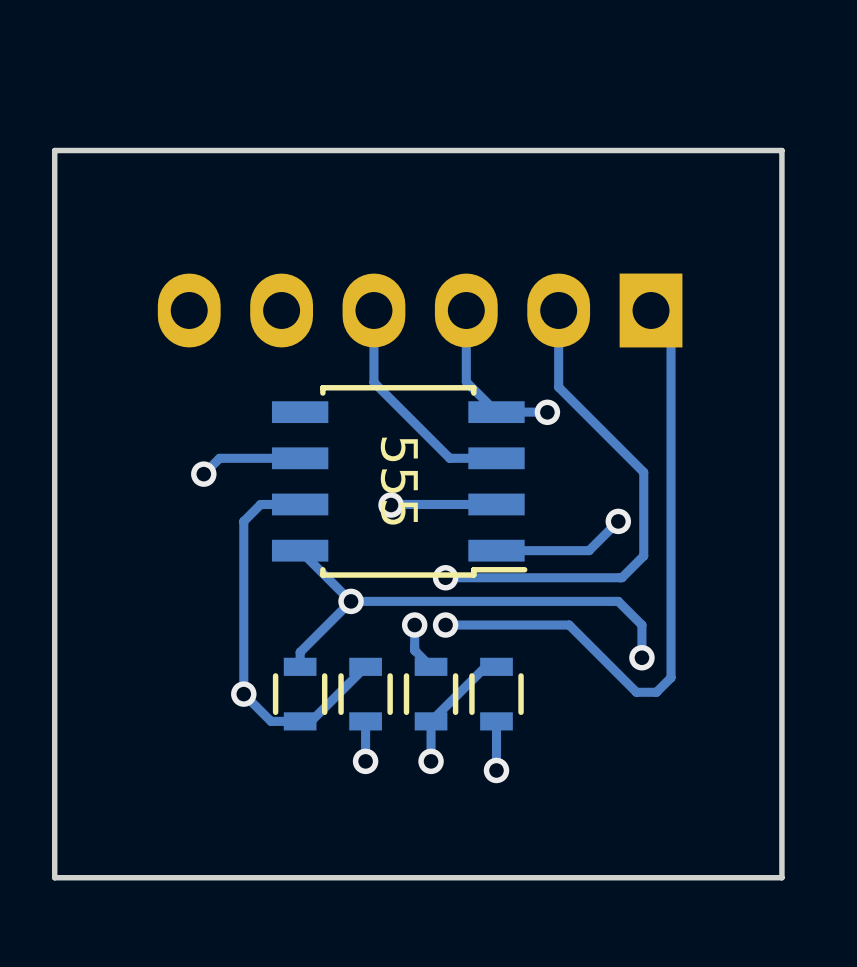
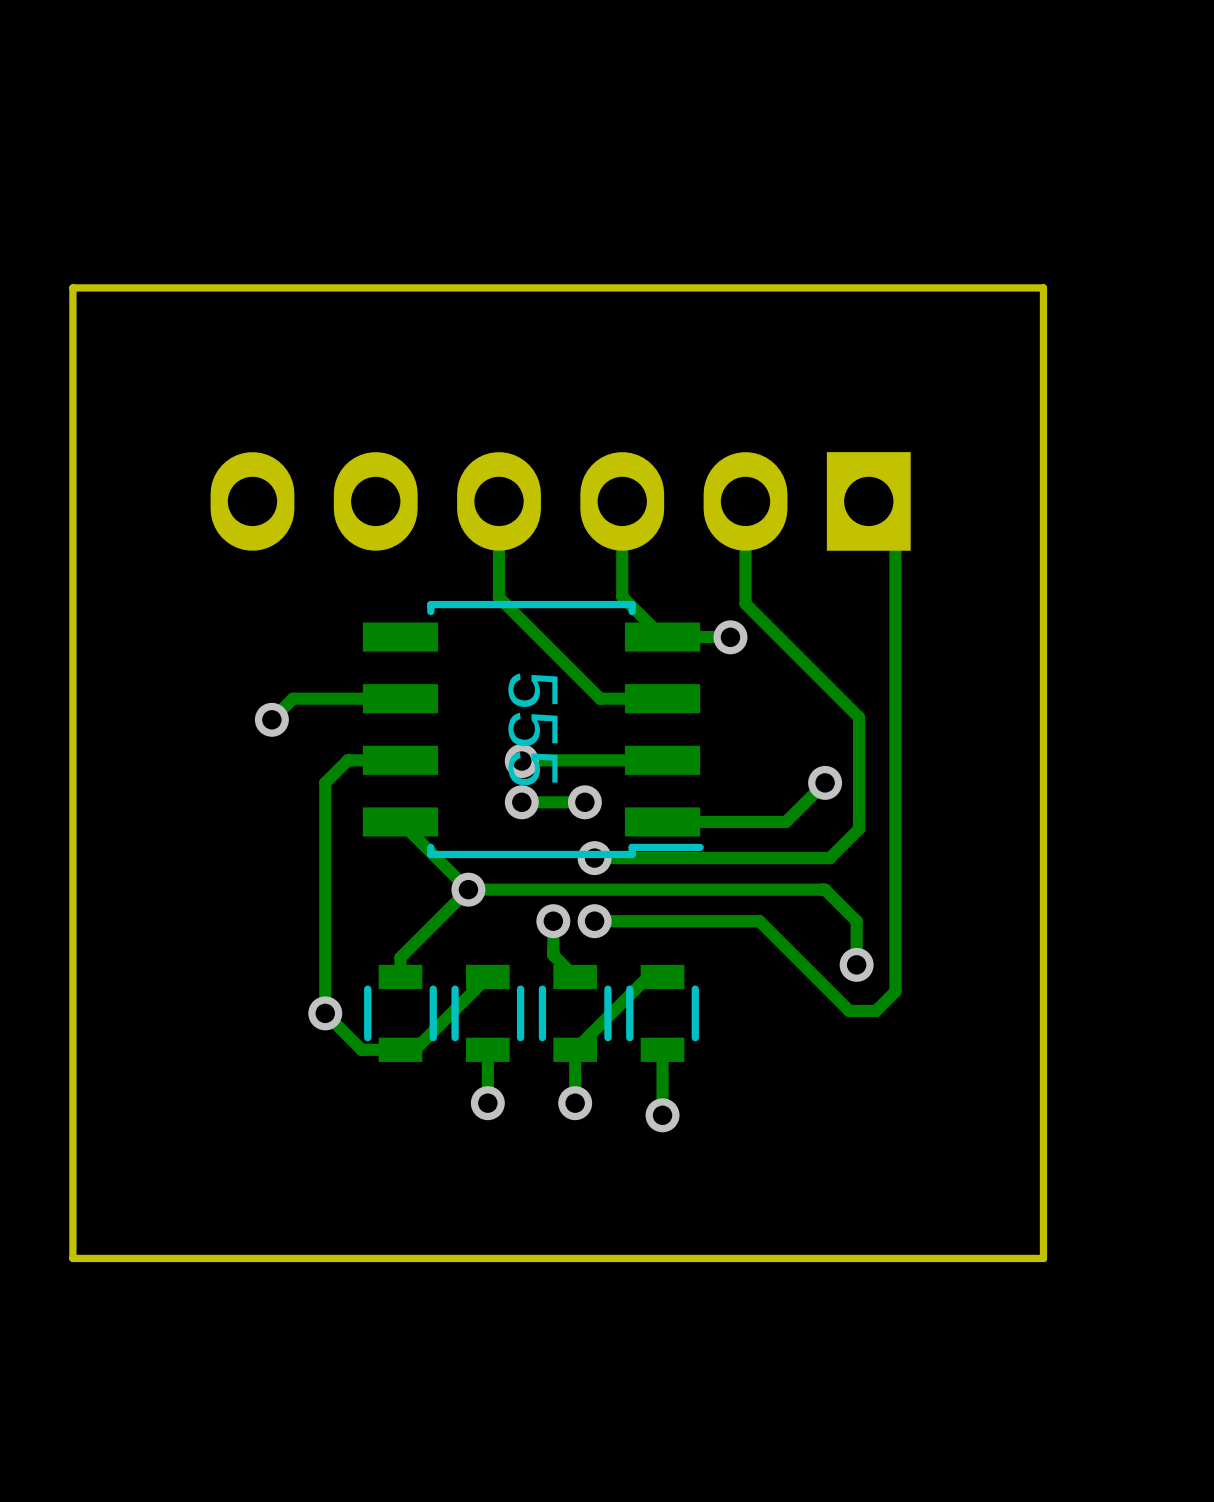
via: none -> (521, 802)
track: none -> (584, 802) (521, 802)
via: none -> (584, 802)

